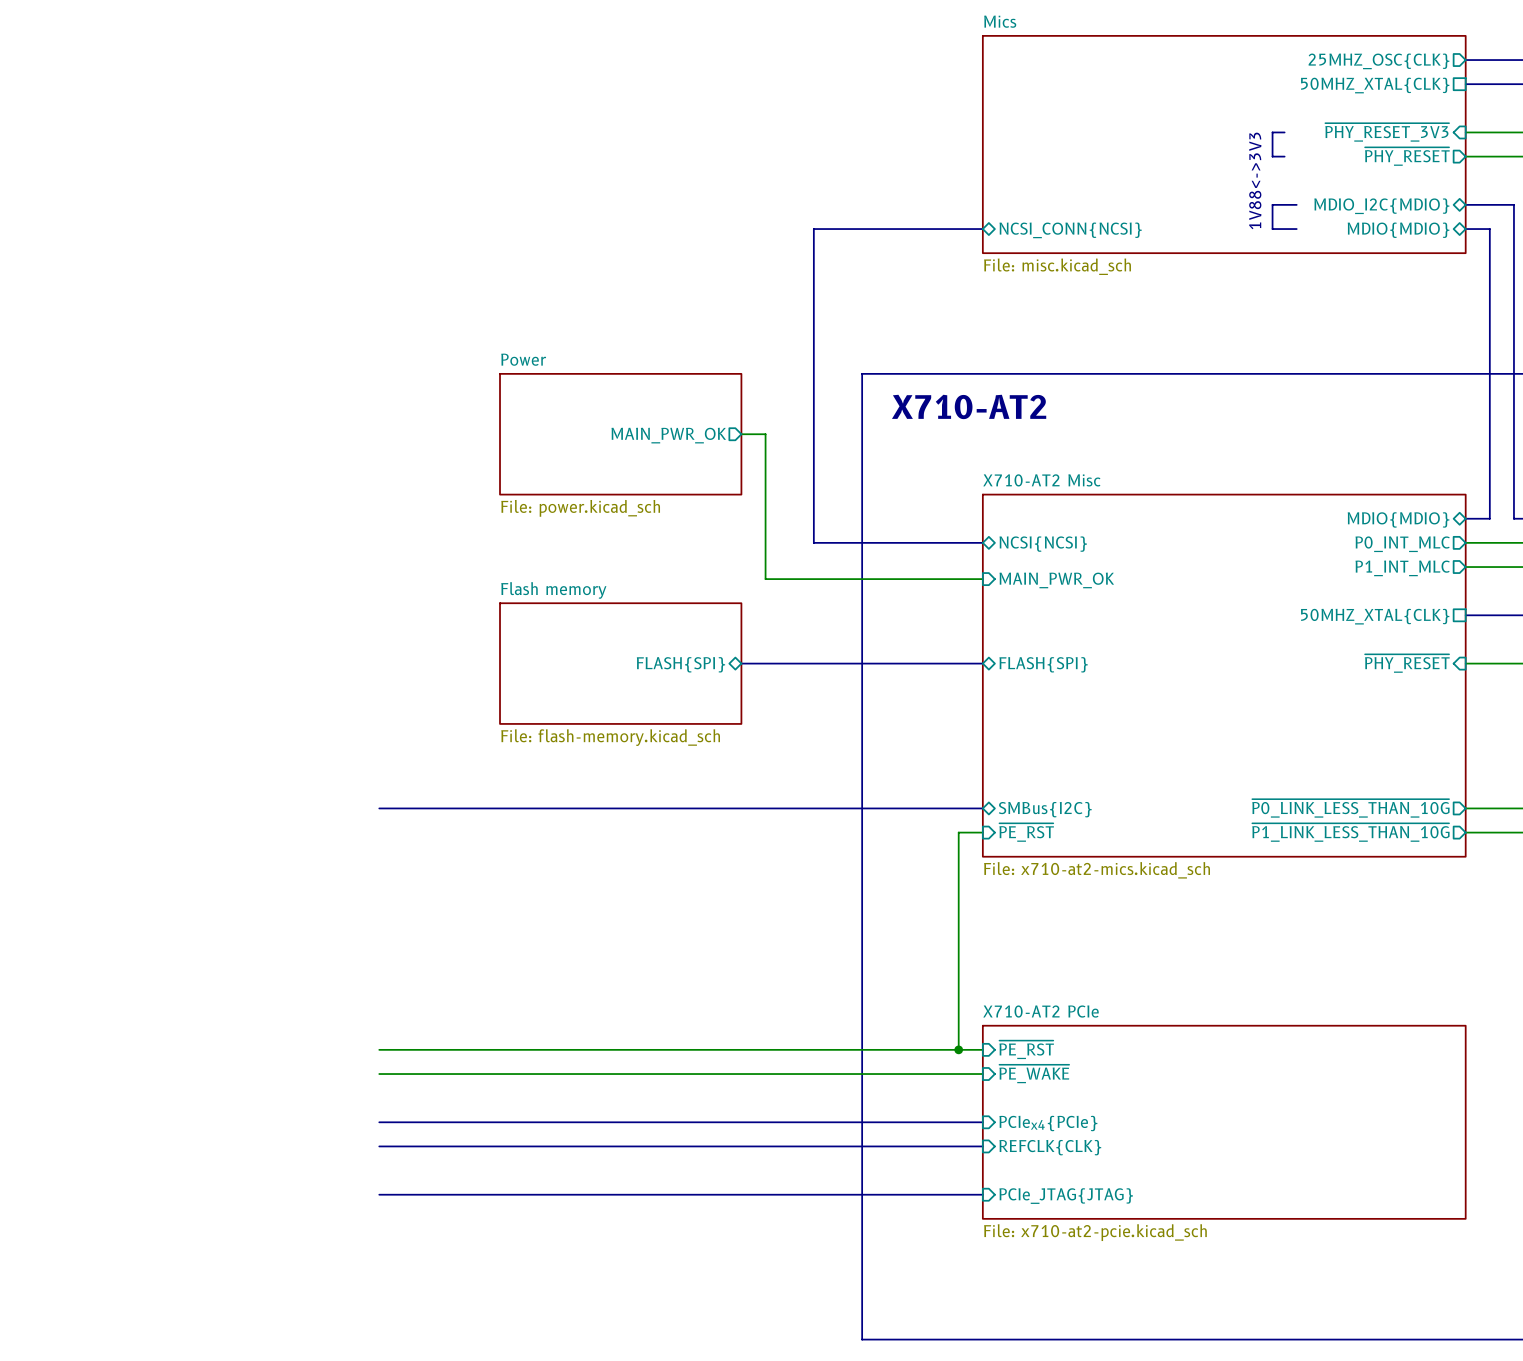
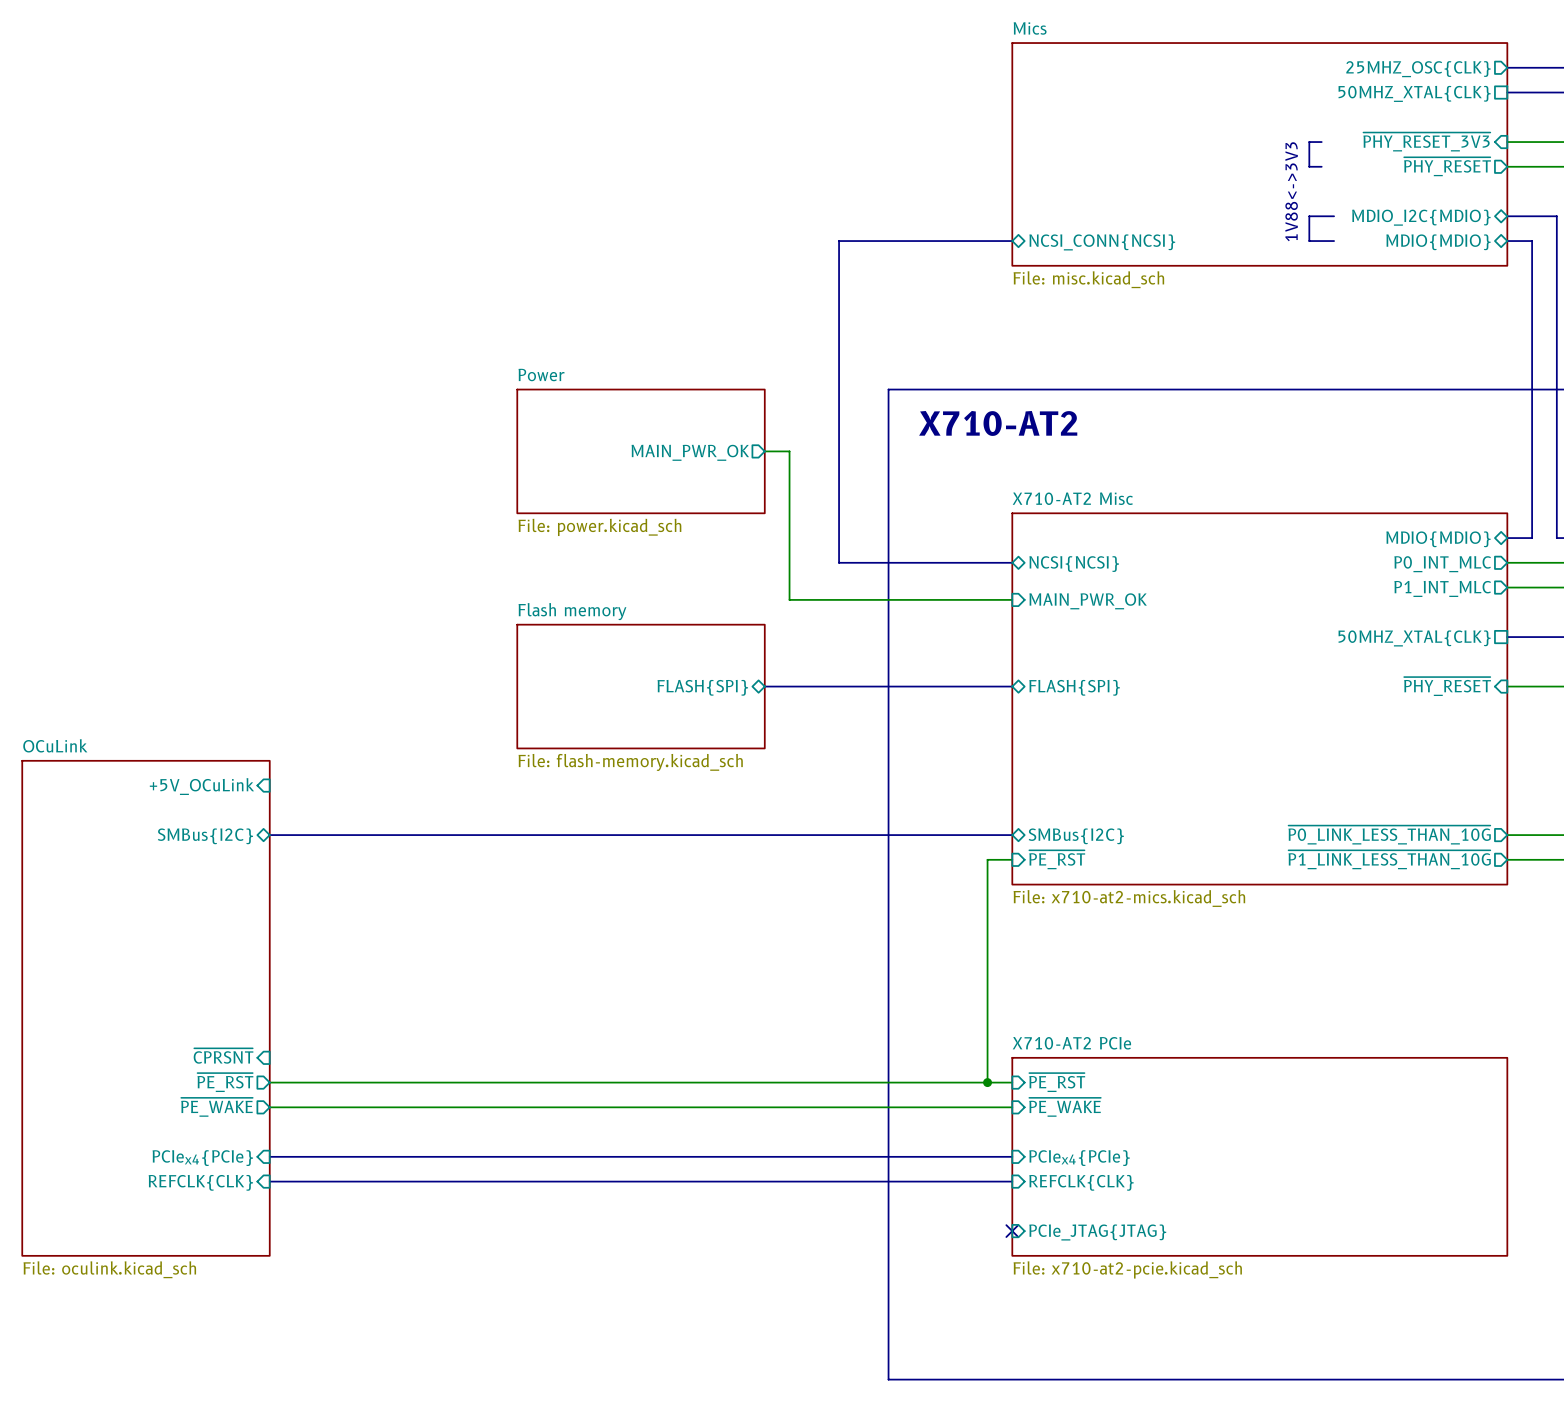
sheet pin: none -> +5V_OCuLink (201, 786)
bus: none -> (269, 835) (393, 835)
sheet pin: none -> SMBus{I2C} (205, 836)
sheet OCuLink: none -> File: oculink.kicad_sch (146, 1008)
sheet pin: none -> ~{CPRSNT} (223, 1056)
sheet pin: none -> ~{PE_RST} (225, 1082)
wire: none -> (269, 1082) (393, 1082)
sheet pin: none -> ~{PE_WAKE} (216, 1107)
wire: none -> (269, 1107) (393, 1107)
bus: none -> (269, 1156) (393, 1156)
sheet pin: none -> PCIex4{PCIe} (202, 1158)
bus: none -> (269, 1181) (393, 1181)
sheet pin: none -> REFCLK{CLK} (200, 1182)
bus: (379, 1194) (982, 1194) -> none
no-connect mark: none -> (1012, 1231)

